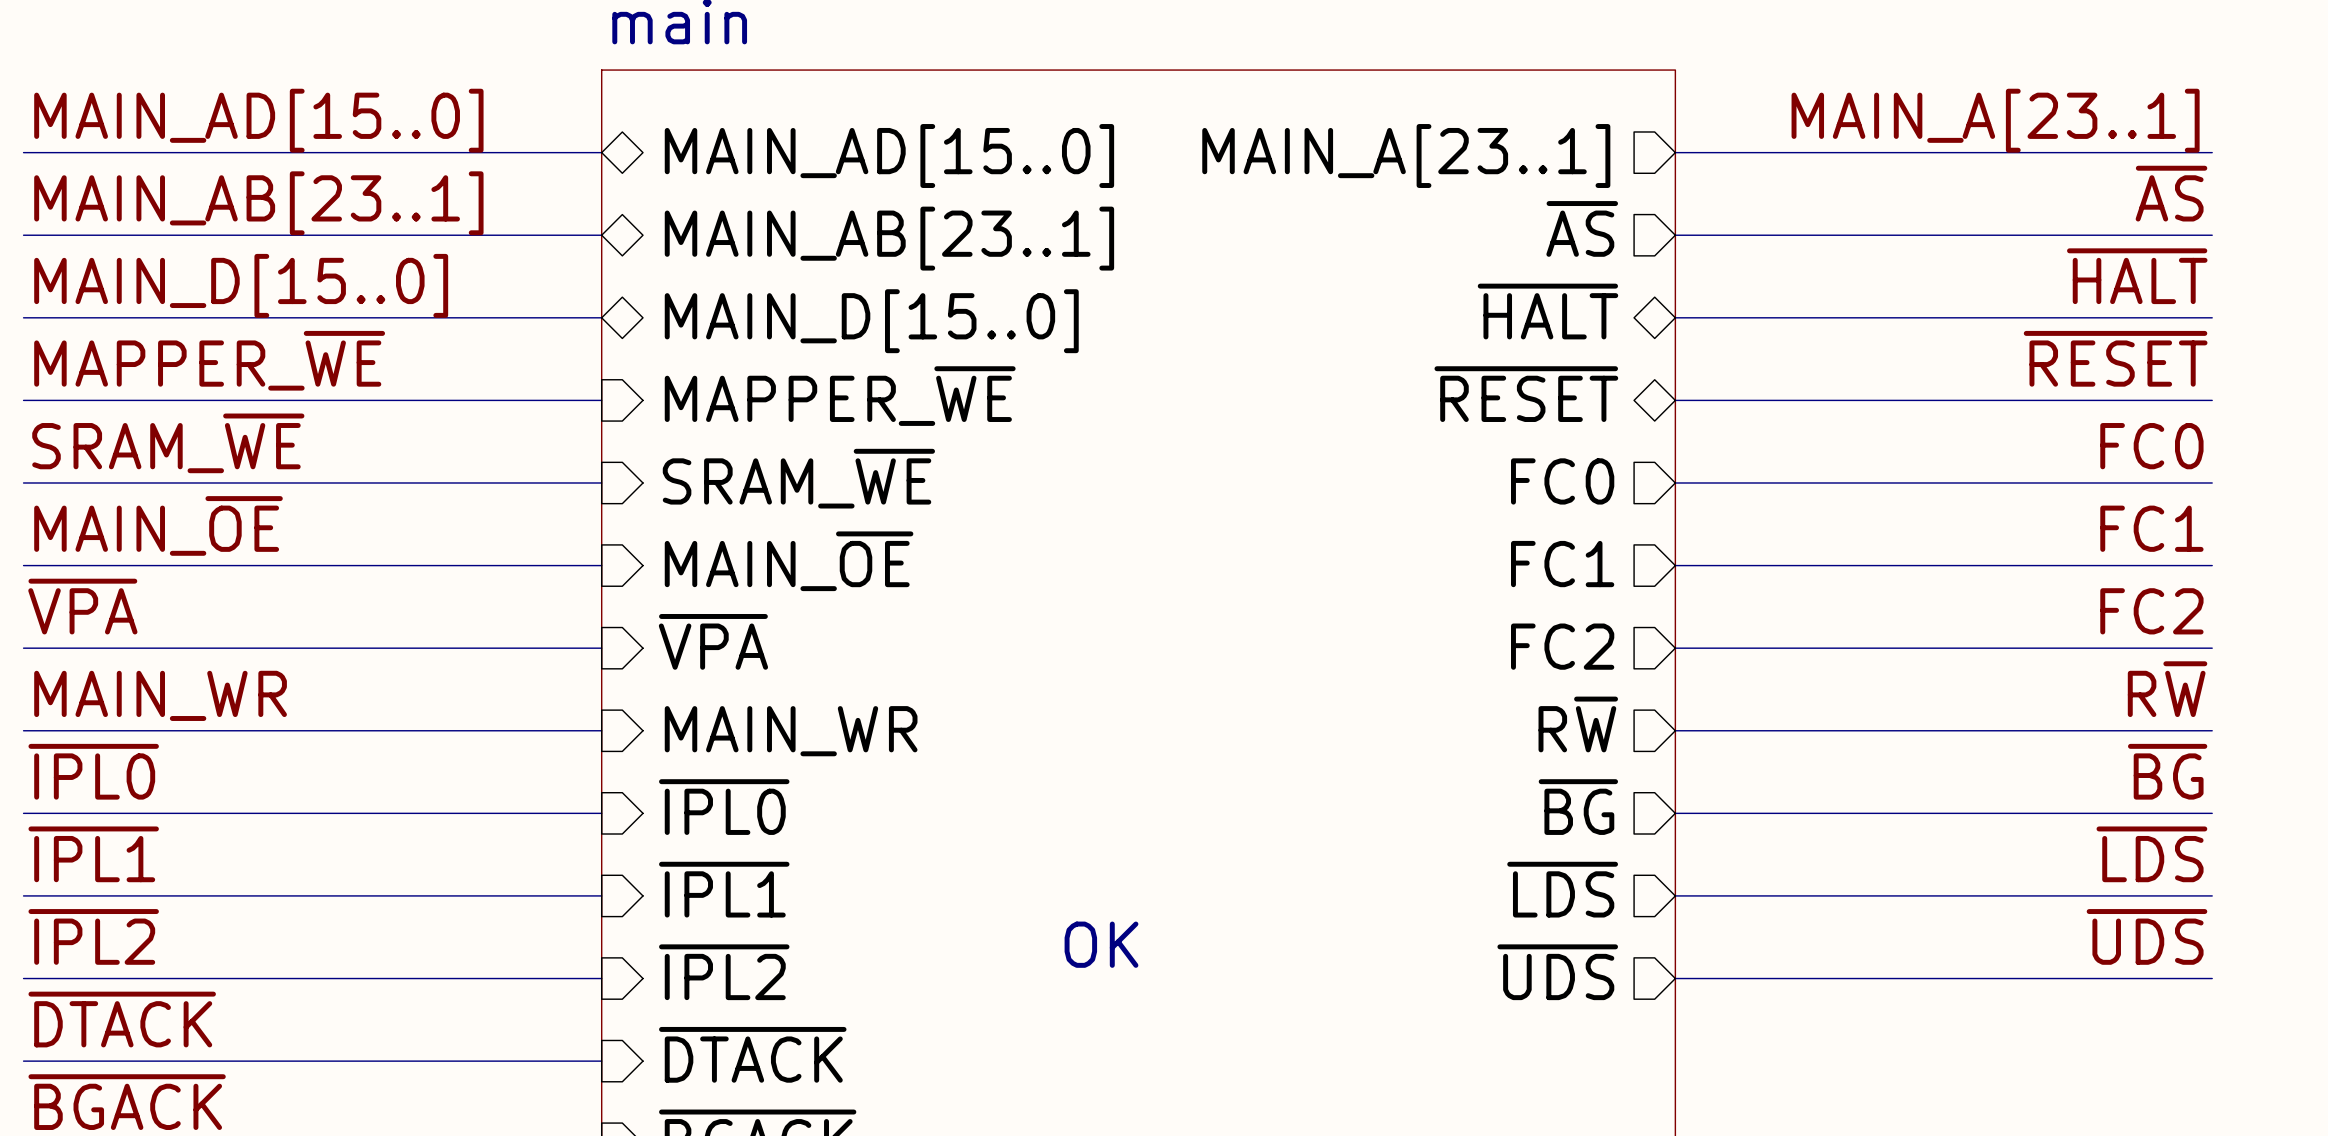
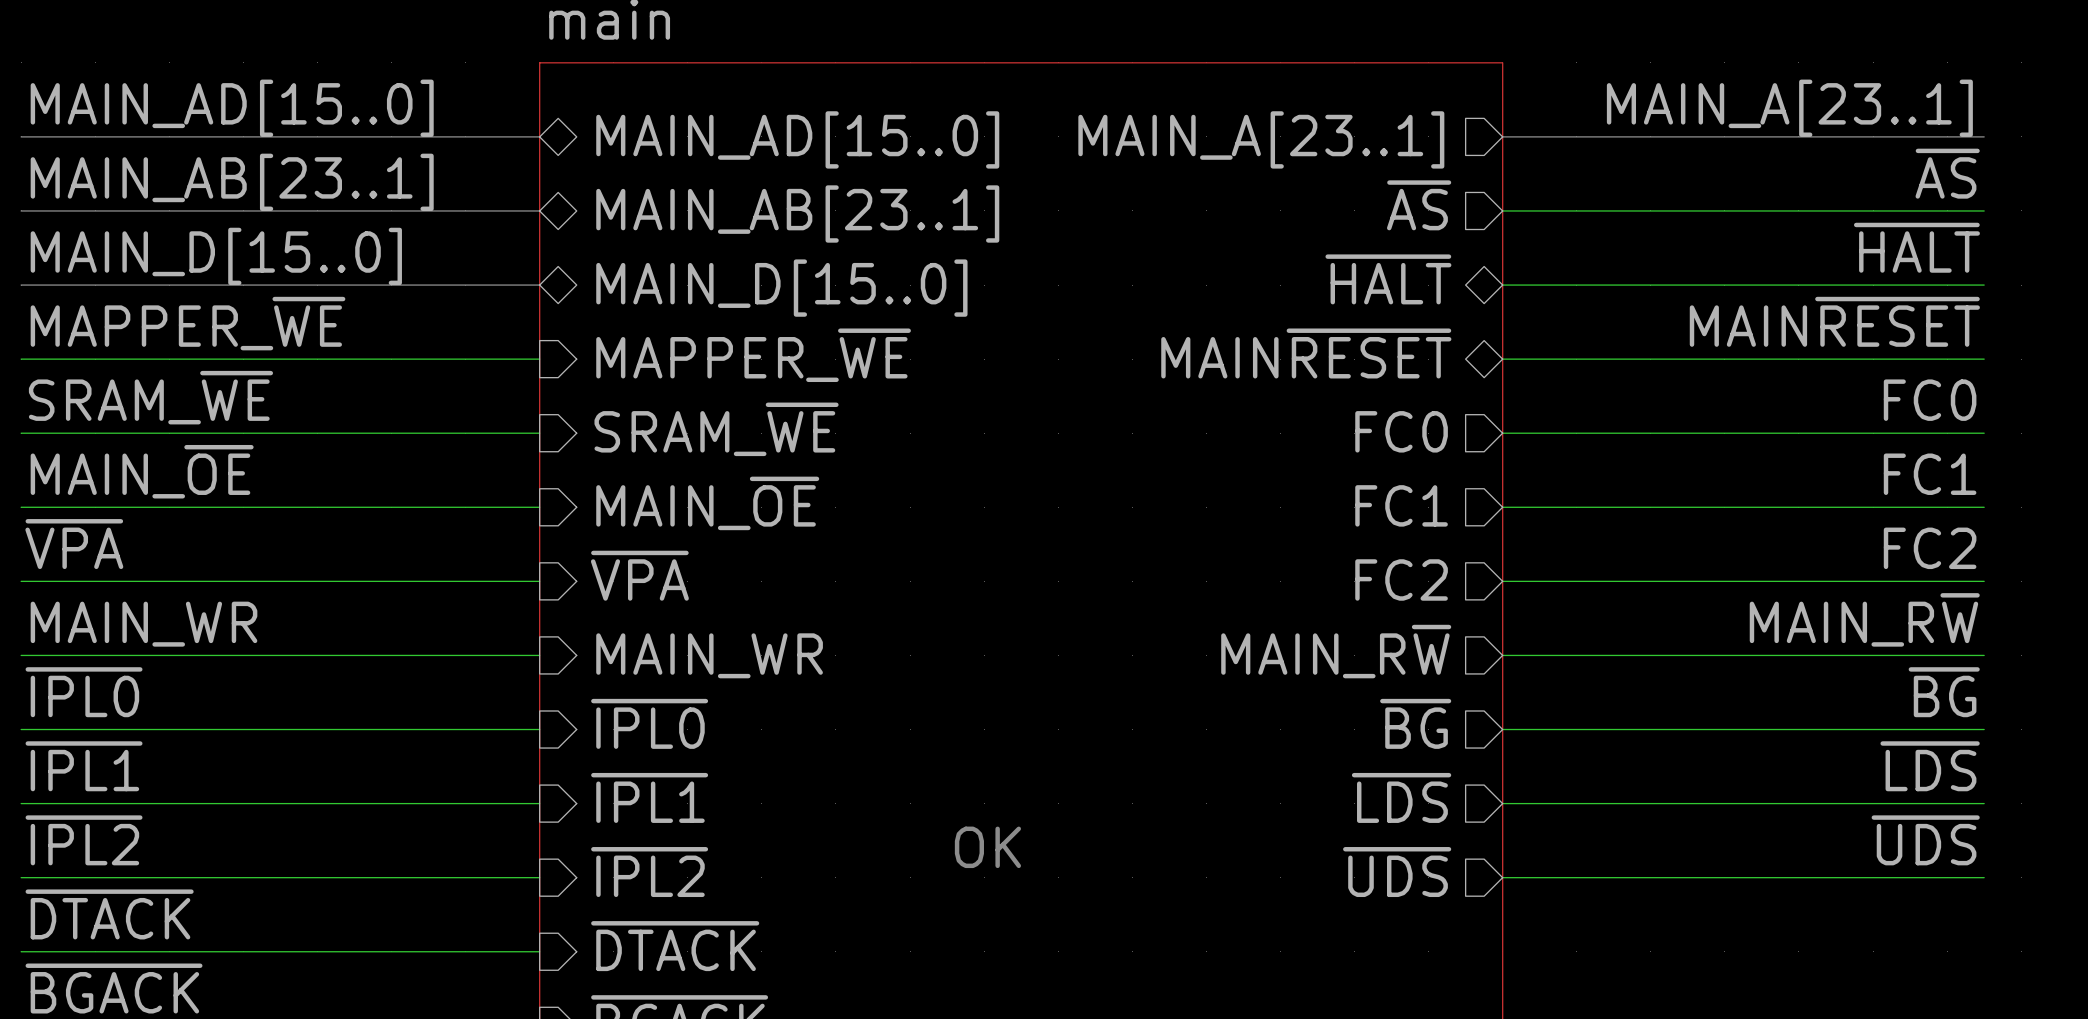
label: ~{RESET} (2115, 358) -> MAIN~{RESET} (1834, 321)
sheet pin: ~{RESET} (1526, 394) -> MAIN~{RESET} (1306, 353)
label: R~{W} (2167, 689) -> MAIN_R~{W} (1864, 619)
sheet pin: R~{W} (1578, 724) -> MAIN_R~{W} (1336, 651)

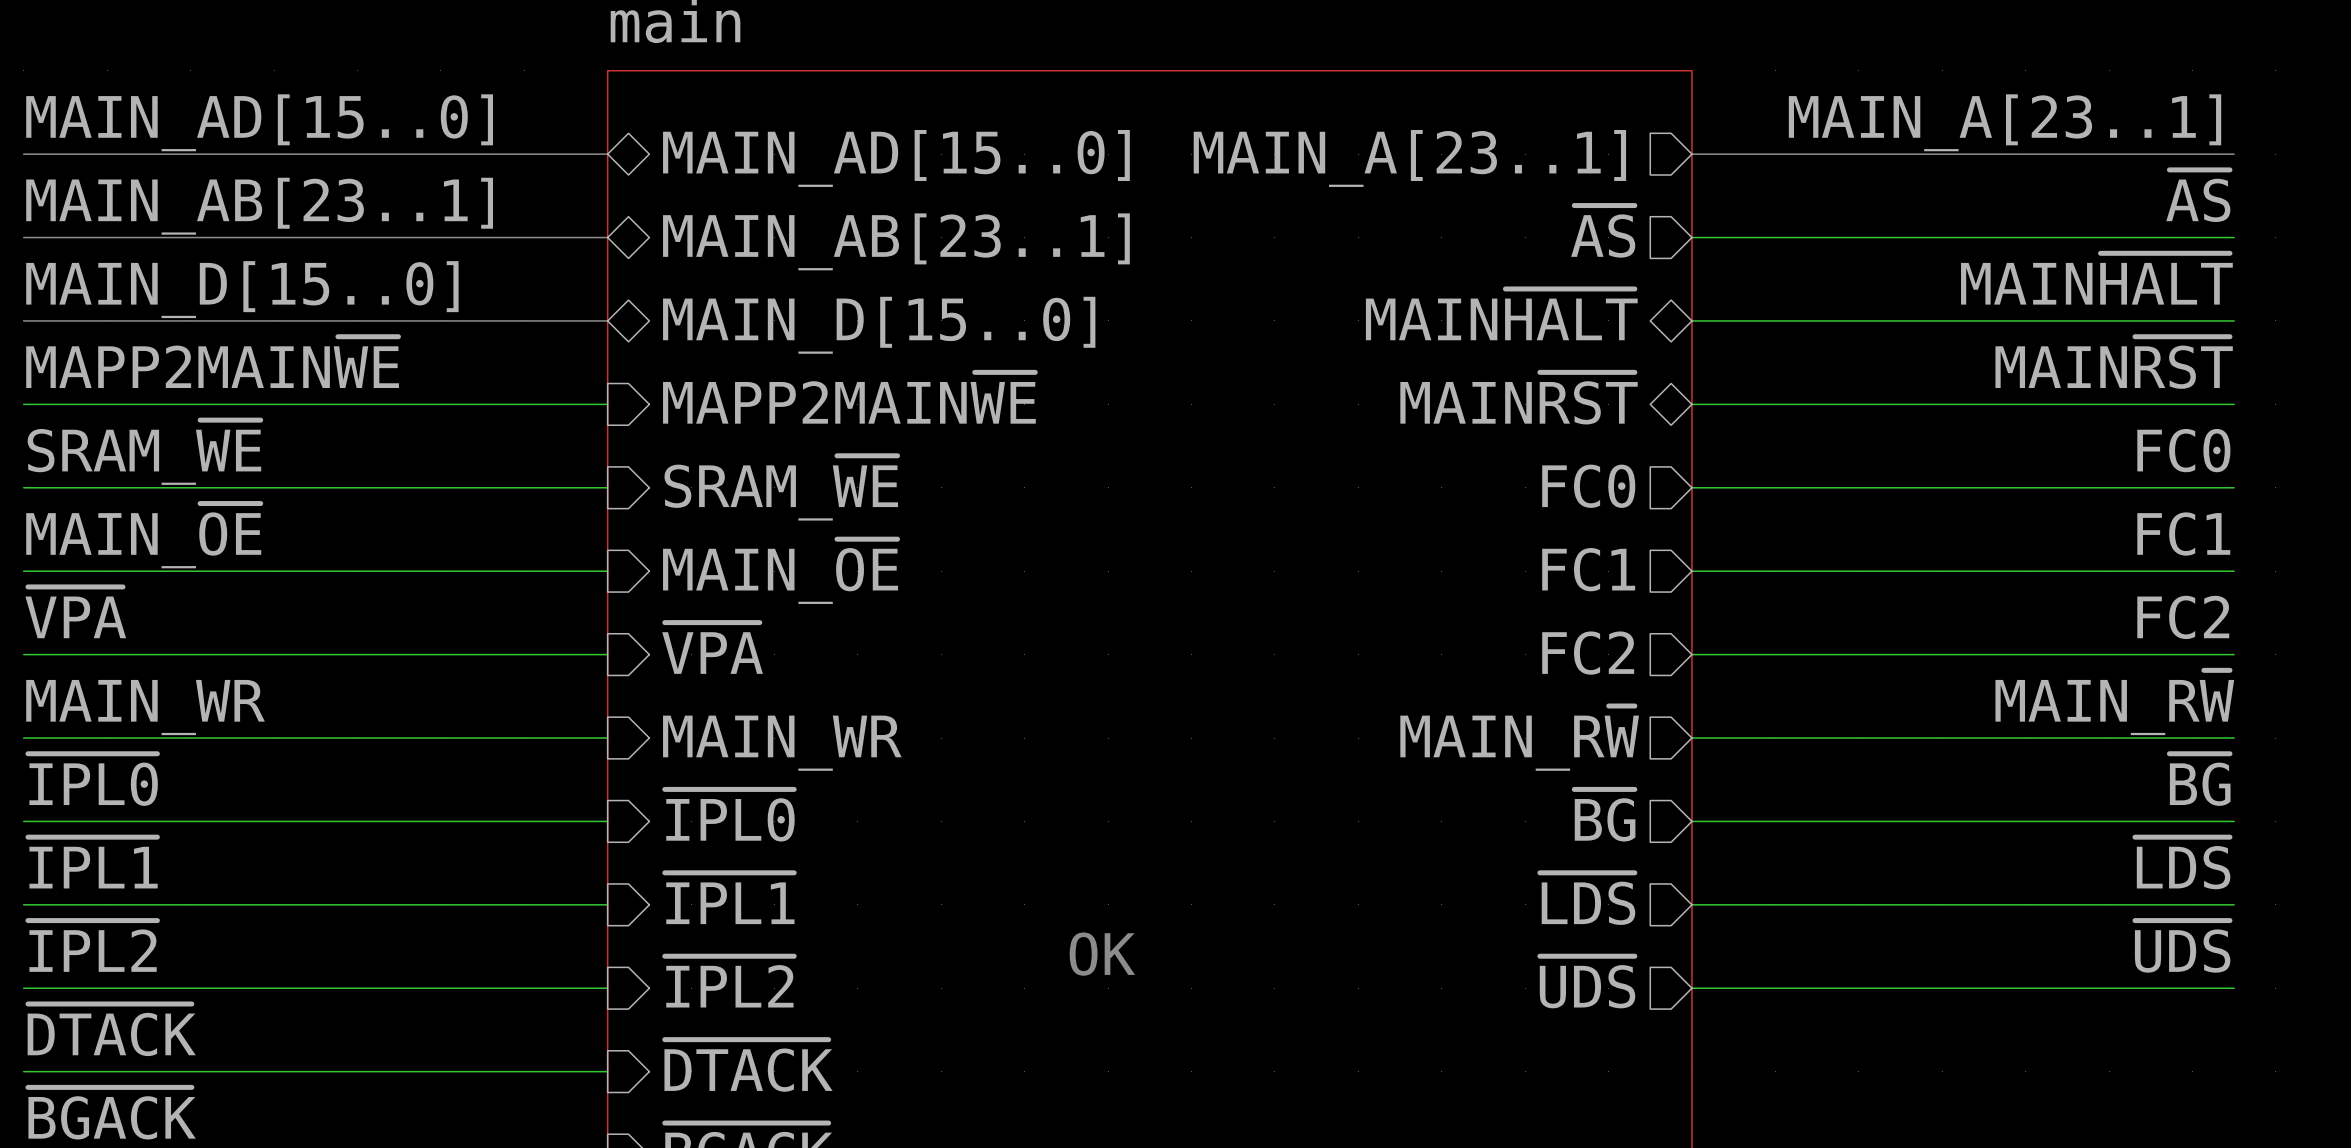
label: ~{HALT} (1916, 247) -> MAIN~{HALT} (2096, 278)
sheet pin: ~{HALT} (1388, 279) -> MAIN~{HALT} (1501, 314)
label: MAIN~{RESET} (1834, 321) -> MAIN~{RST} (2114, 362)
label: MAPPER_~{WE} (188, 323) -> MAPP2MAIN~{WE} (212, 362)
sheet pin: MAIN~{RESET} (1306, 353) -> MAIN~{RST} (1519, 398)
sheet pin: MAPPER_~{WE} (753, 355) -> MAPP2MAIN~{WE} (849, 398)

